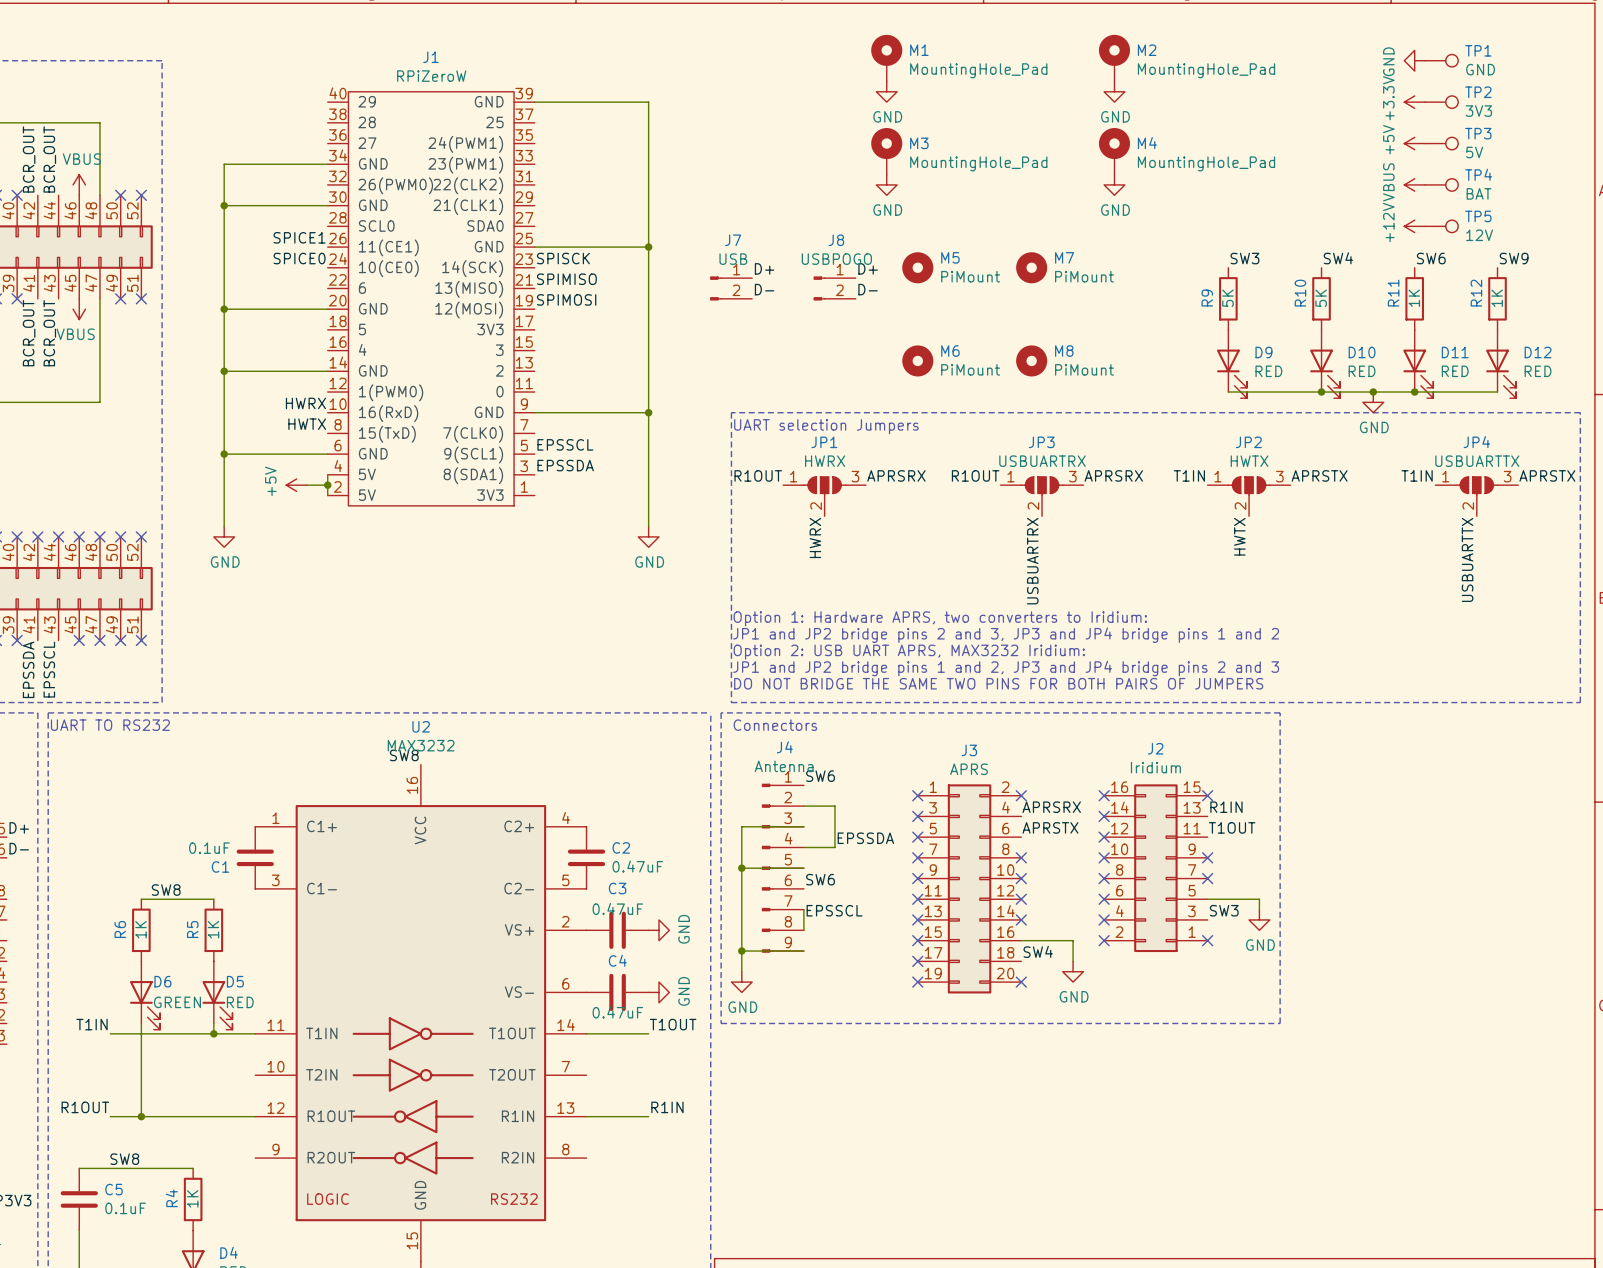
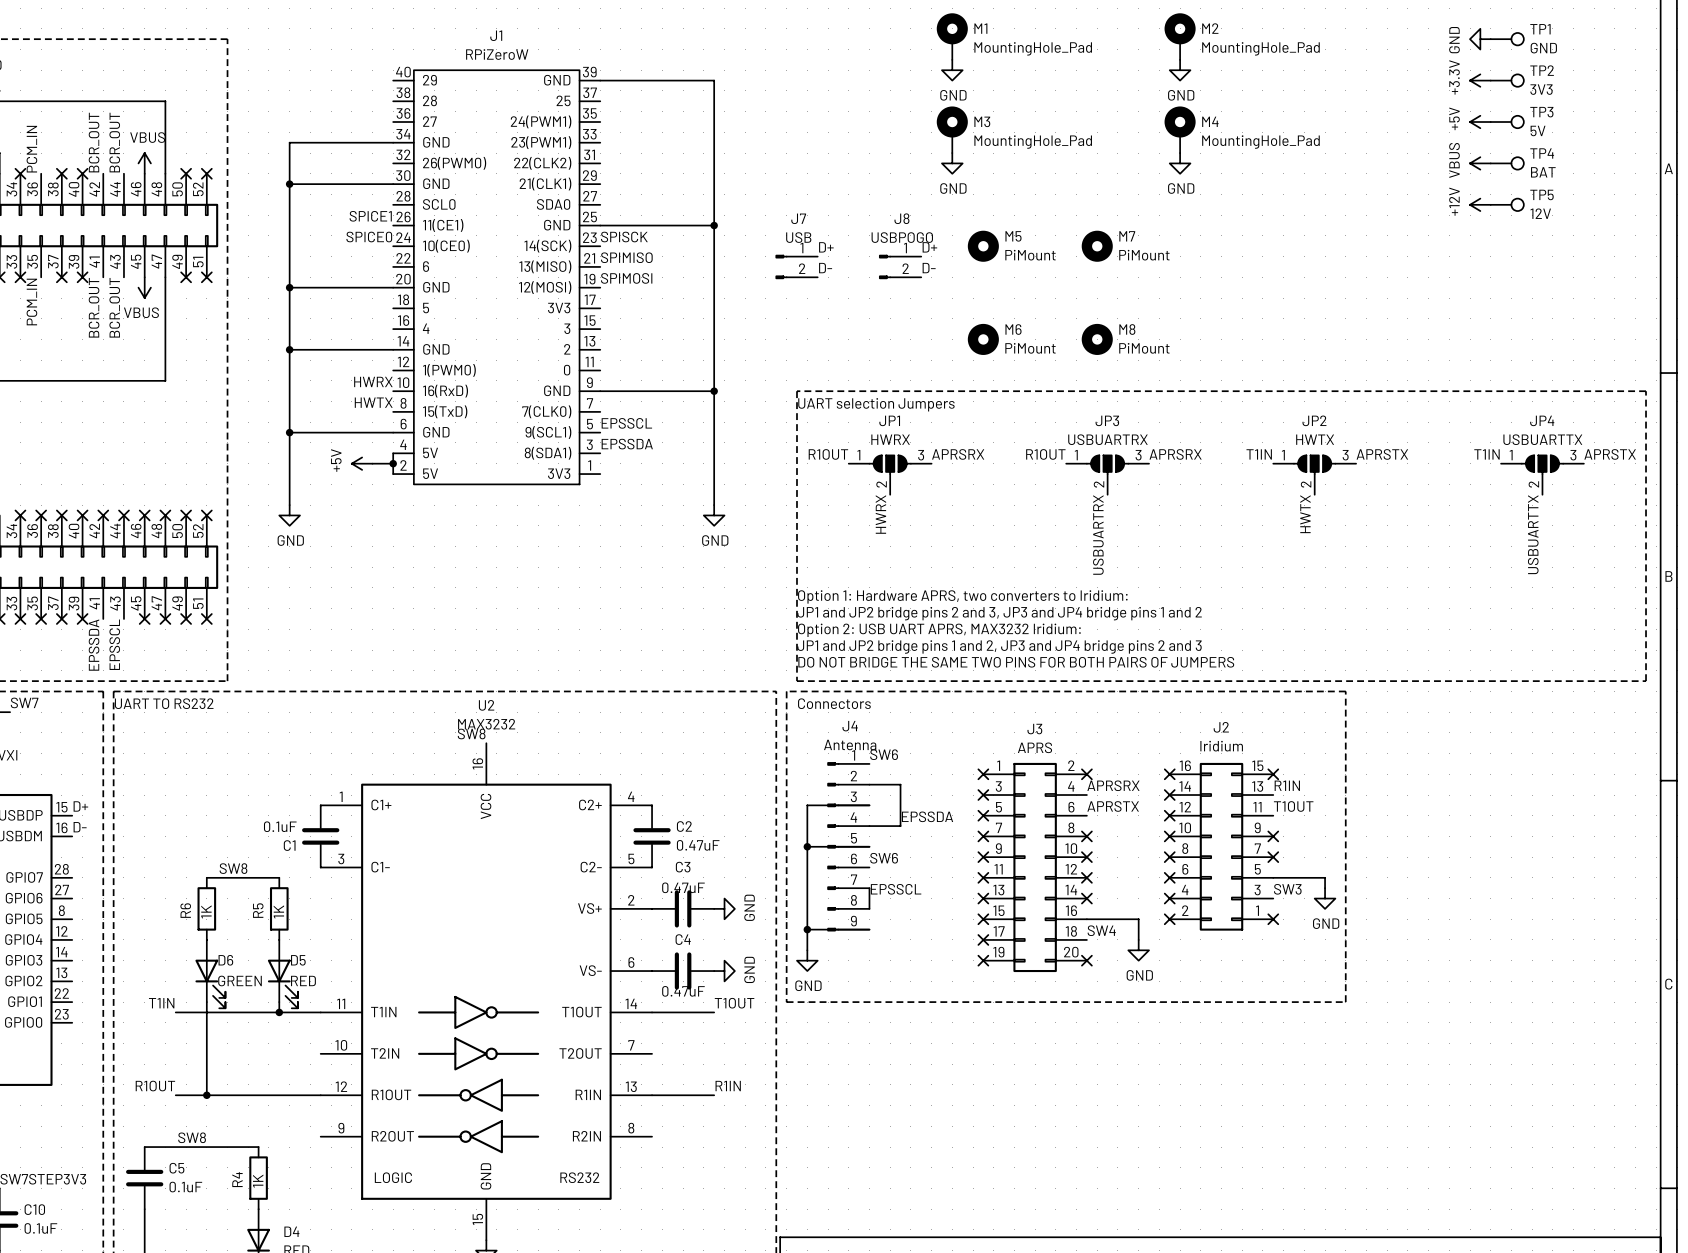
label: SW3 (1244, 258) -> none
label: SW4 (1338, 258) -> none
label: SW6 (1431, 258) -> none
label: SW9 (1514, 258) -> none
R9: 5K (1228, 298) -> none
R10: 5K (1321, 298) -> none
R11: 1K (1414, 298) -> none
R12: 1K (1497, 298) -> none
D9: RED (1231, 364) -> none
D10: RED (1325, 364) -> none
D11: RED (1418, 364) -> none
D12: RED (1501, 364) -> none
wire: (1228, 392) (1497, 392) -> none
junction: (1321, 392) -> none
junction: (1373, 392) -> none
junction: (1414, 392) -> none
power symbol: GND (1373, 402) -> none

